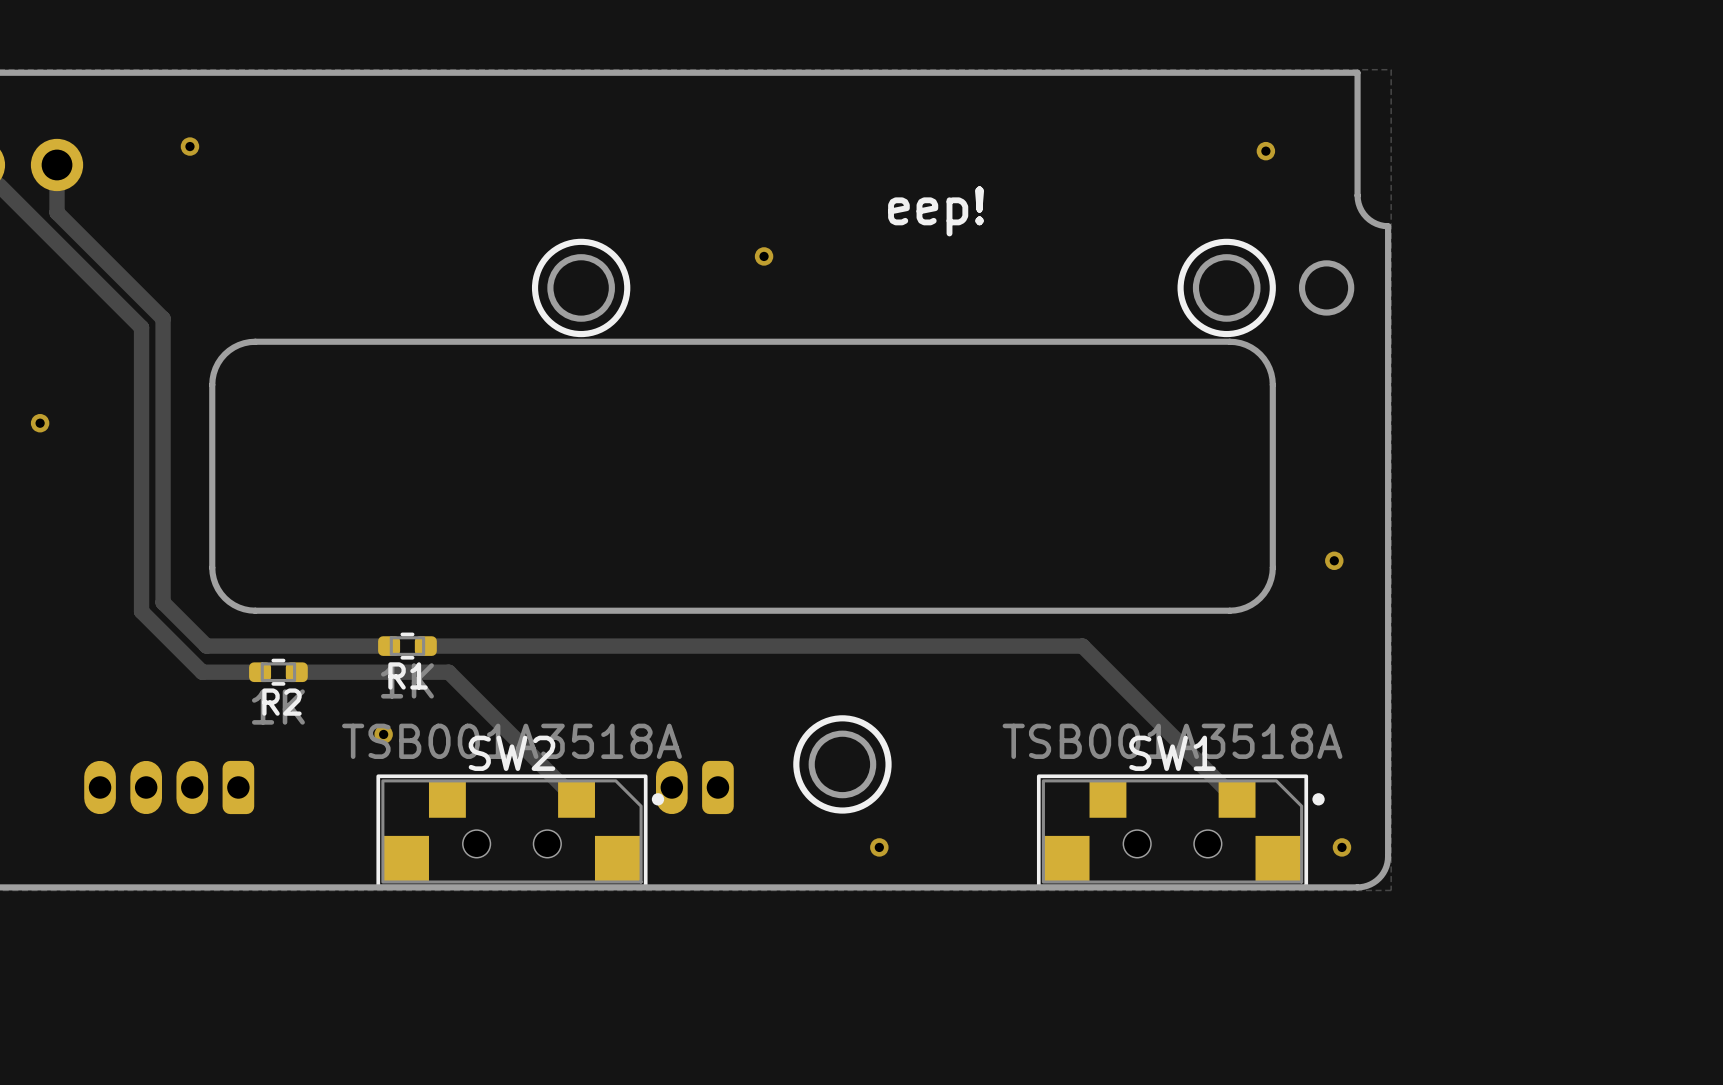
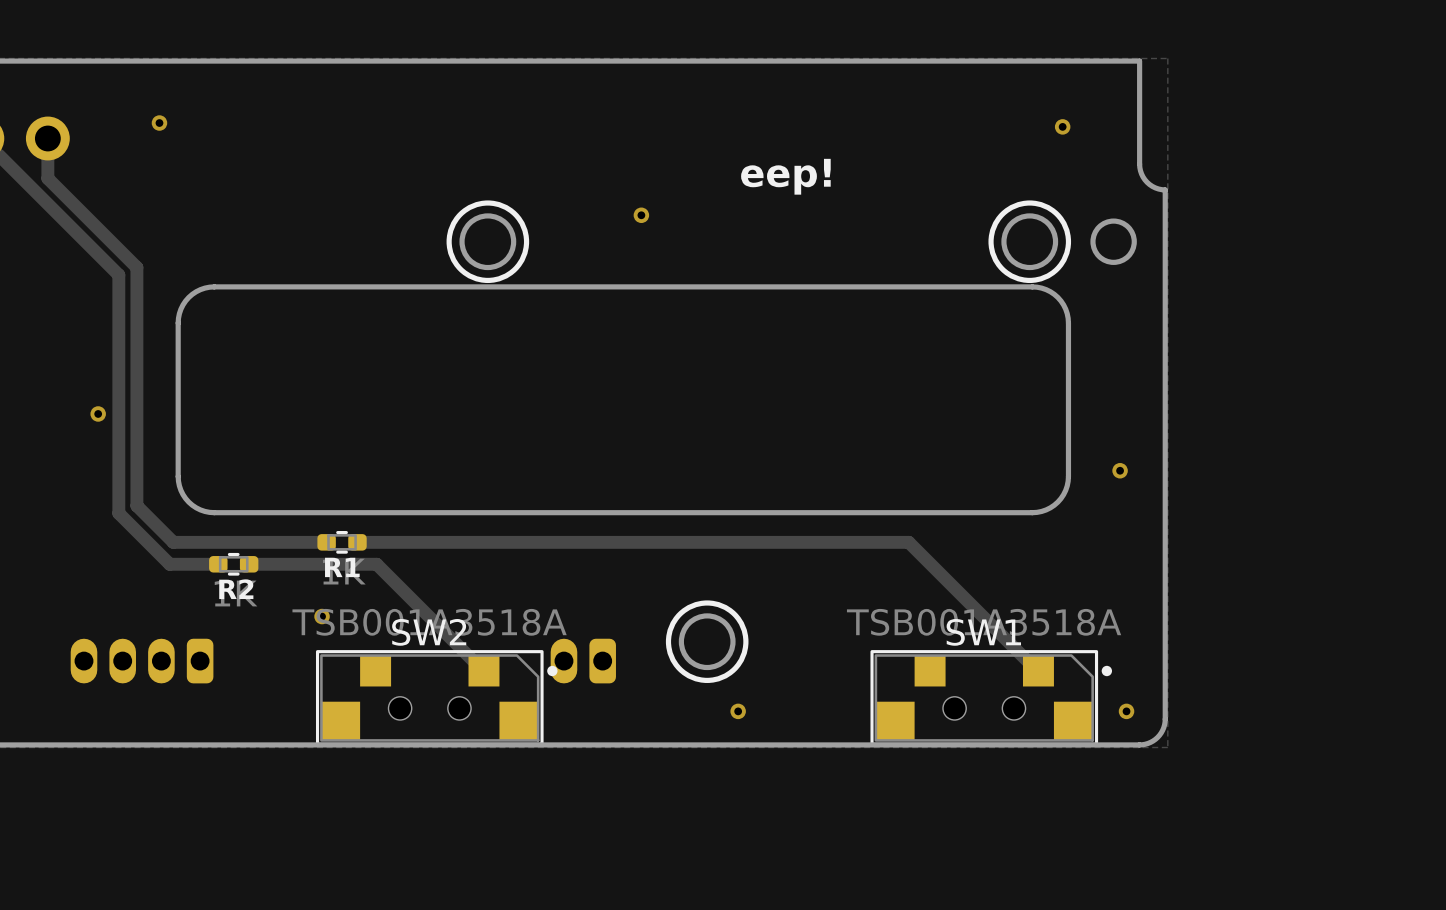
via position: (40, 423) -> (98, 413)

